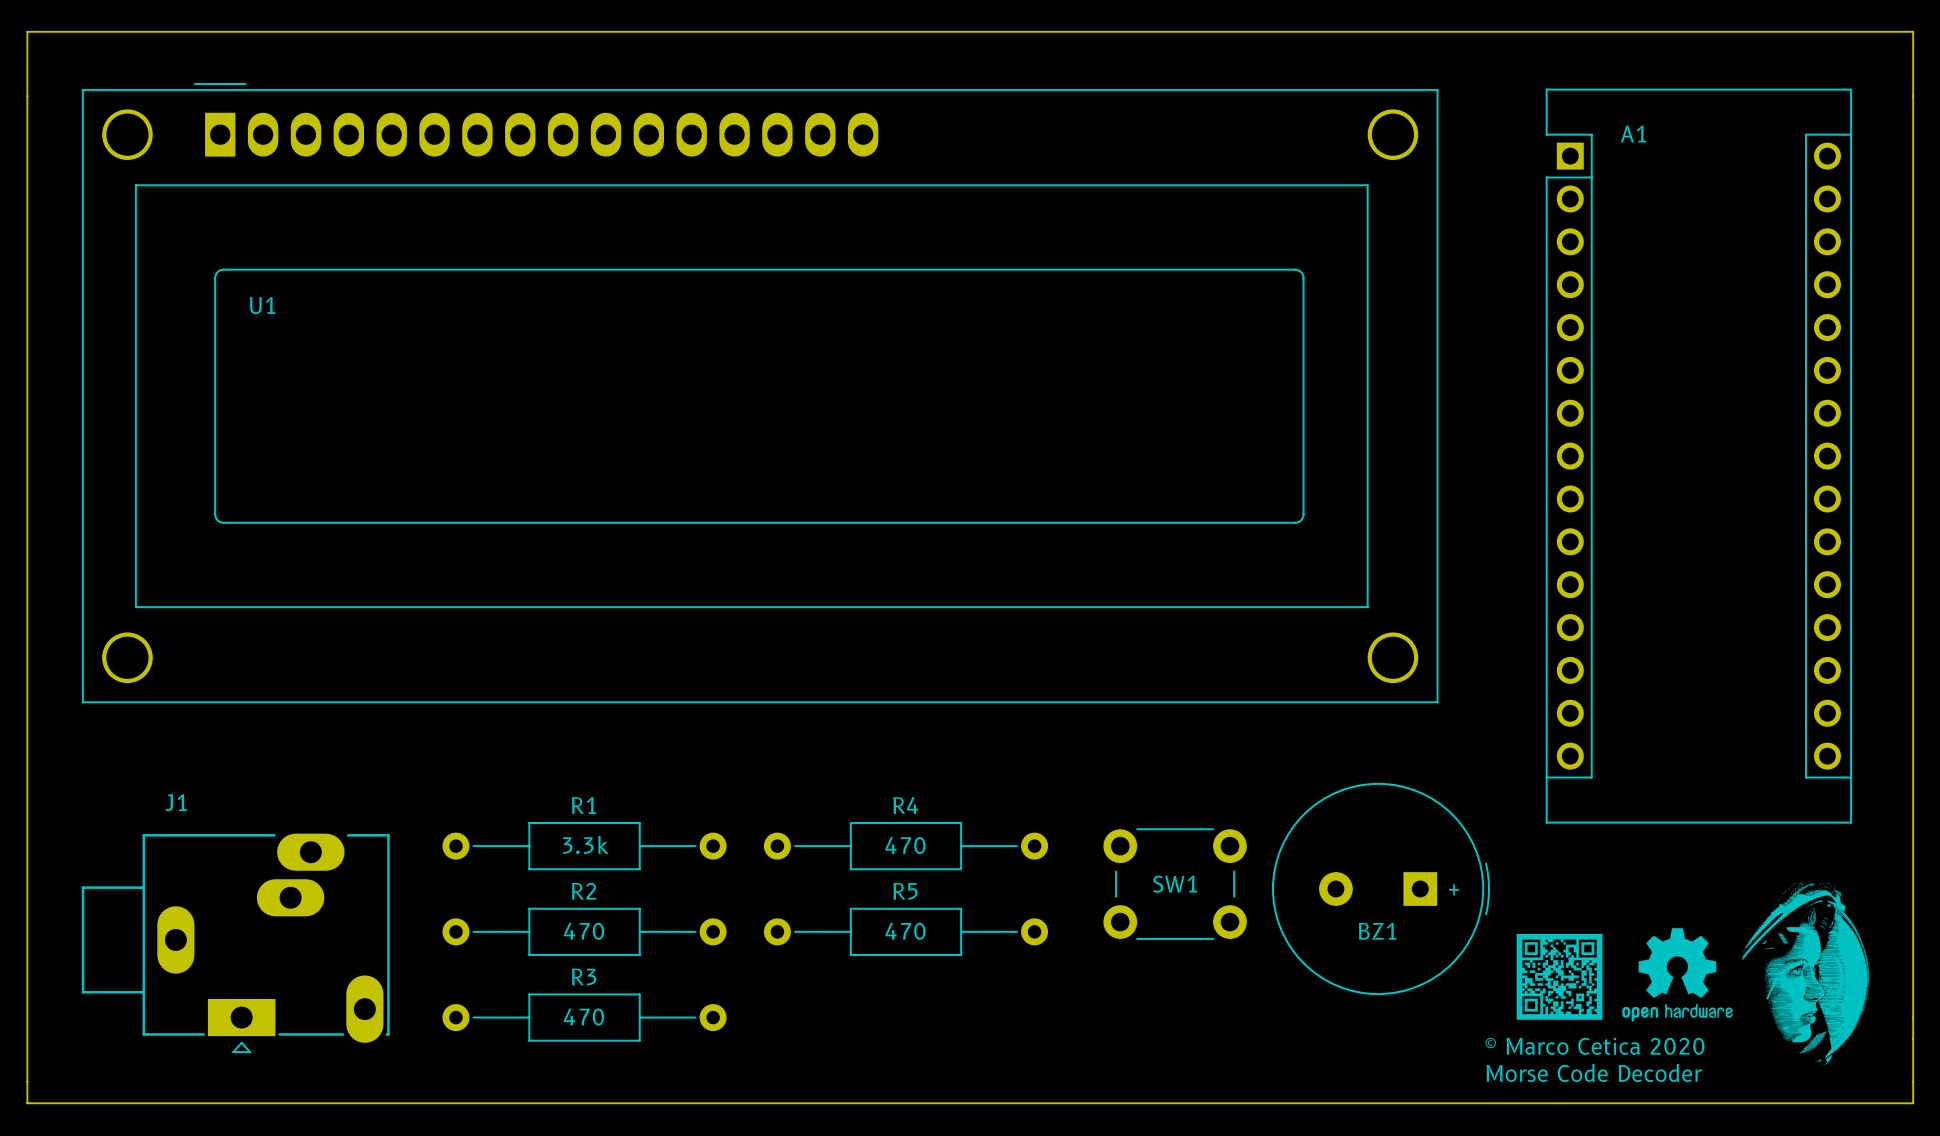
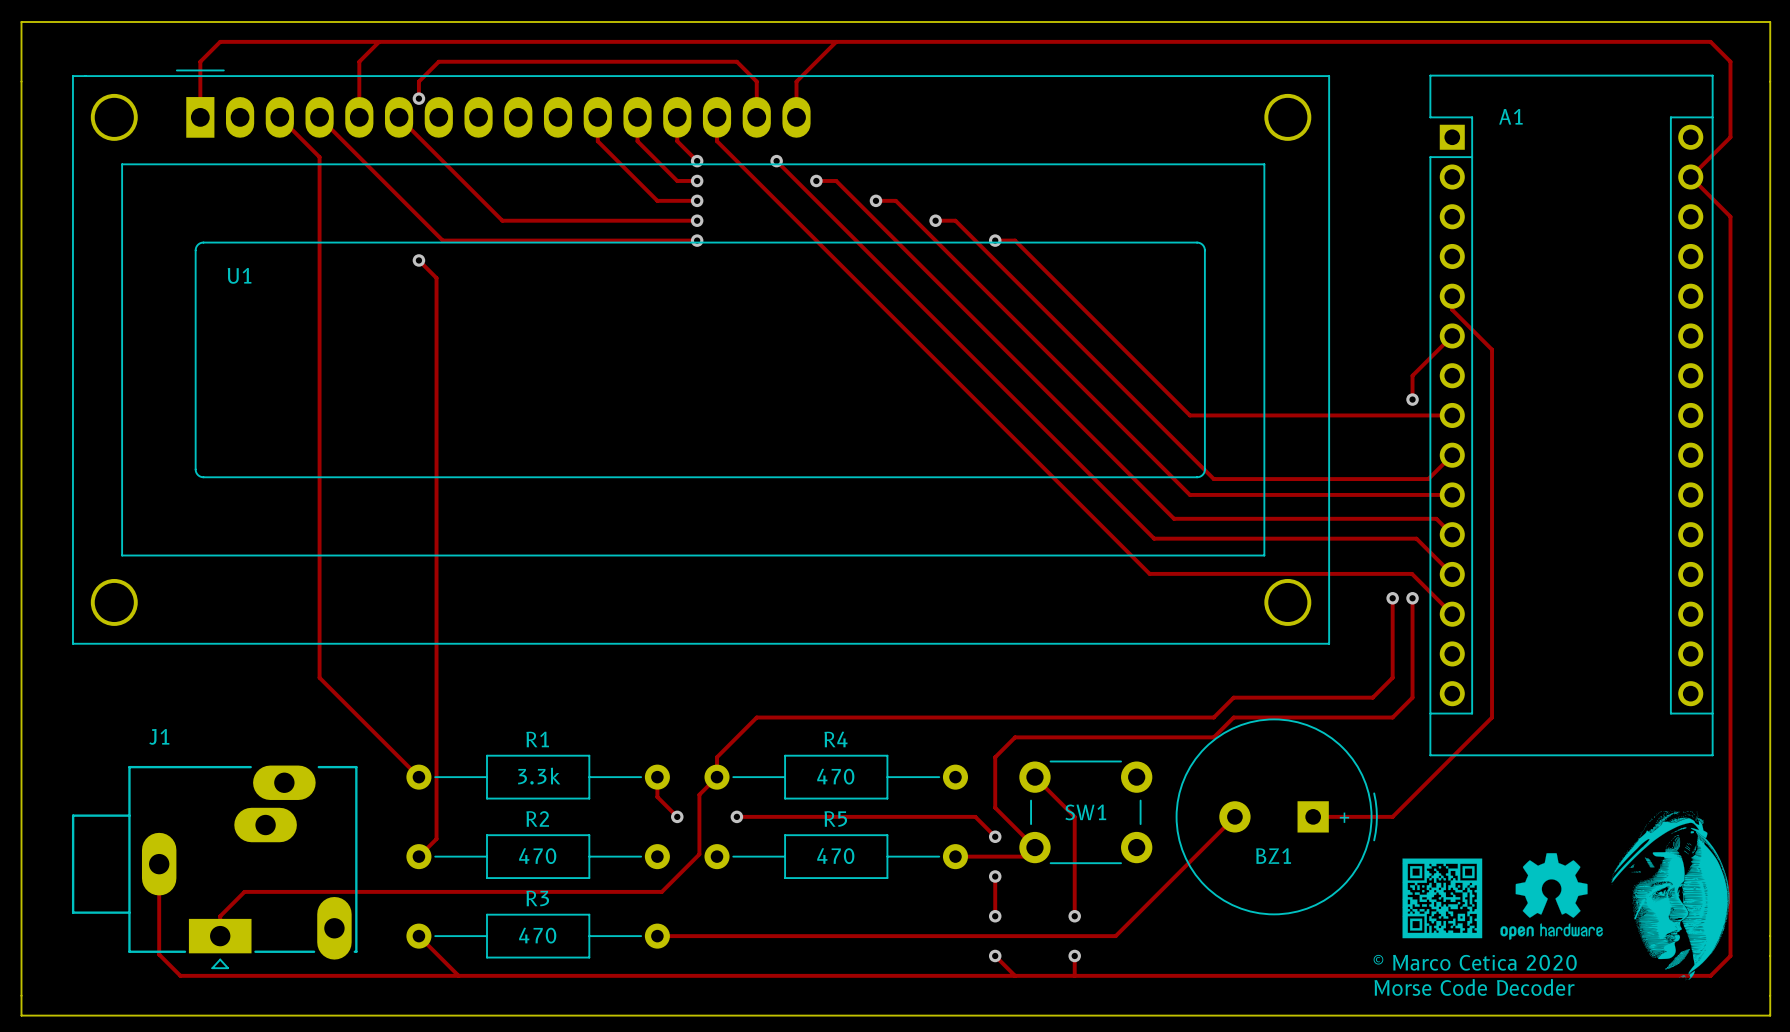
track: none -> (379, 41) (359, 61) (359, 117)
track: none -> (836, 41) (796, 81) (796, 117)
track: none -> (418, 98) (418, 81) (438, 61) (736, 61) (756, 81) (756, 117)
via: none -> (418, 98)
track: none -> (200, 117) (200, 61) (220, 41) (1710, 41) (1730, 61) (1730, 137) (1690, 177) (1730, 216) (1730, 955) (1710, 975) (180, 975) (159, 954) (159, 864)
track: none -> (279, 117) (319, 157) (319, 677) (418, 777)
track: none -> (319, 117) (442, 240) (697, 240)
track: none -> (399, 117) (502, 220) (697, 220)
track: none -> (597, 117) (597, 141) (657, 200) (697, 200)
track: none -> (637, 117) (637, 141) (677, 180) (697, 180)
track: none -> (677, 117) (677, 141) (697, 161)
track: none -> (717, 117) (717, 141) (1149, 573) (1412, 573) (1452, 614)
via: none -> (697, 161)
track: none -> (776, 161) (1154, 538) (1416, 538) (1452, 574)
via: none -> (776, 161)
via: none -> (697, 180)
track: none -> (816, 180) (836, 180) (1174, 518) (1436, 518) (1452, 534)
via: none -> (816, 180)
via: none -> (697, 200)
track: none -> (875, 200) (895, 200) (1189, 494) (1452, 494)
via: none -> (875, 200)
via: none -> (697, 220)
track: none -> (935, 220) (955, 220) (1213, 479) (1428, 479) (1452, 455)
via: none -> (935, 220)
via: none -> (697, 240)
track: none -> (995, 240) (1015, 240) (1189, 415) (1452, 415)
via: none -> (995, 240)
track: none -> (418, 260) (436, 278) (436, 839) (418, 856)
via: none -> (418, 260)
track: none -> (1452, 296) (1452, 309) (1492, 349) (1492, 717) (1392, 816) (1313, 816)
track: none -> (1452, 335) (1412, 375) (1412, 399)
via: none -> (1412, 399)
track: none -> (1392, 598) (1392, 677) (1372, 697) (1233, 697) (1213, 717) (756, 717) (717, 757) (717, 777) (699, 794) (699, 854) (661, 891) (244, 891) (220, 916) (220, 936)
via: none -> (1392, 598)
track: none -> (1412, 598) (1412, 697) (1392, 717) (1233, 717) (1213, 737) (1015, 737) (995, 757) (995, 807) (1034, 847) (1025, 856) (955, 856)
via: none -> (1412, 598)
track: none -> (657, 777) (657, 797) (677, 816)
track: none -> (1034, 777) (1074, 816) (1074, 916)
via: none -> (677, 816)
track: none -> (736, 816) (975, 816) (995, 836)
via: none -> (736, 816)
track: none -> (1234, 816) (1115, 936) (657, 936)
via: none -> (995, 836)
track: none -> (995, 876) (995, 916)
via: none -> (995, 876)
via: none -> (995, 916)
via: none -> (1074, 916)
track: none -> (418, 936) (458, 975)
track: none -> (995, 955) (1015, 975)
via: none -> (995, 955)
track: none -> (1074, 955) (1074, 975)
via: none -> (1074, 955)

